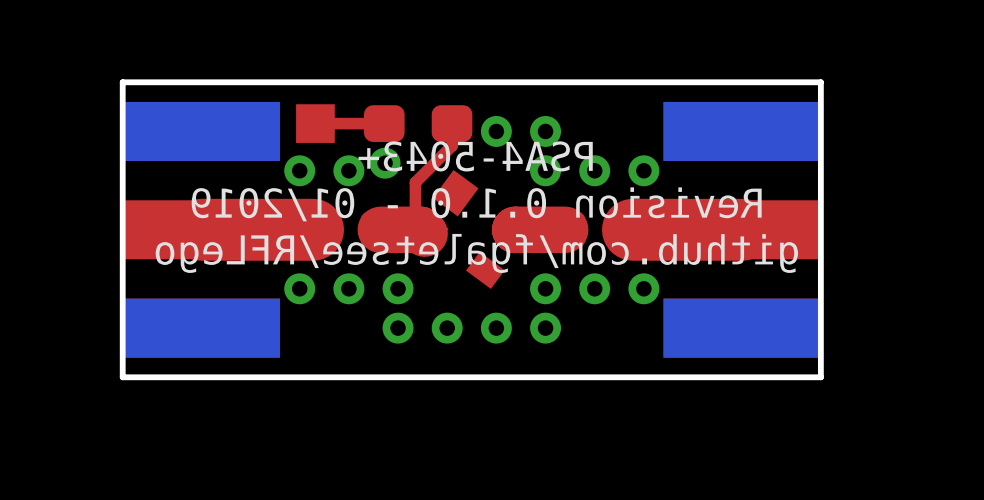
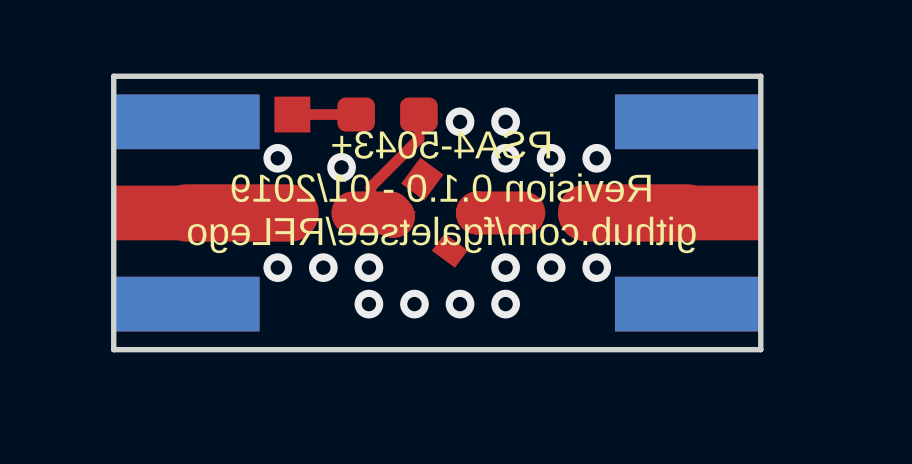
top track: (452, 145) (415, 182) (415, 215) -> (418, 135) (419, 138) (370, 187) (370, 195) (352, 212)
via: (385, 163) -> none
via: (348, 170) -> none
via: none -> (341, 167)

